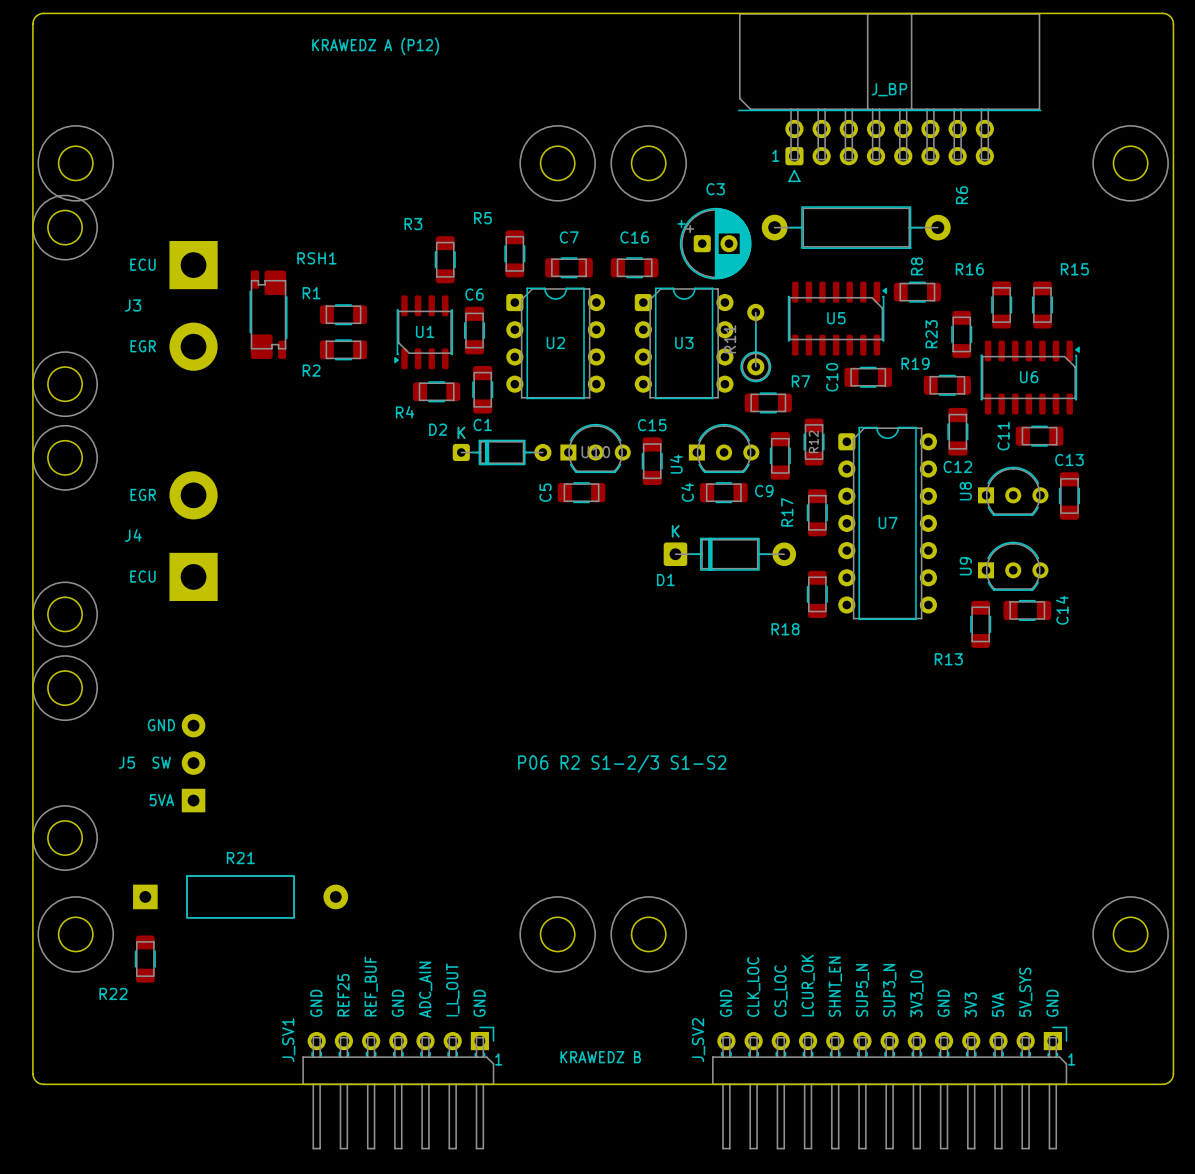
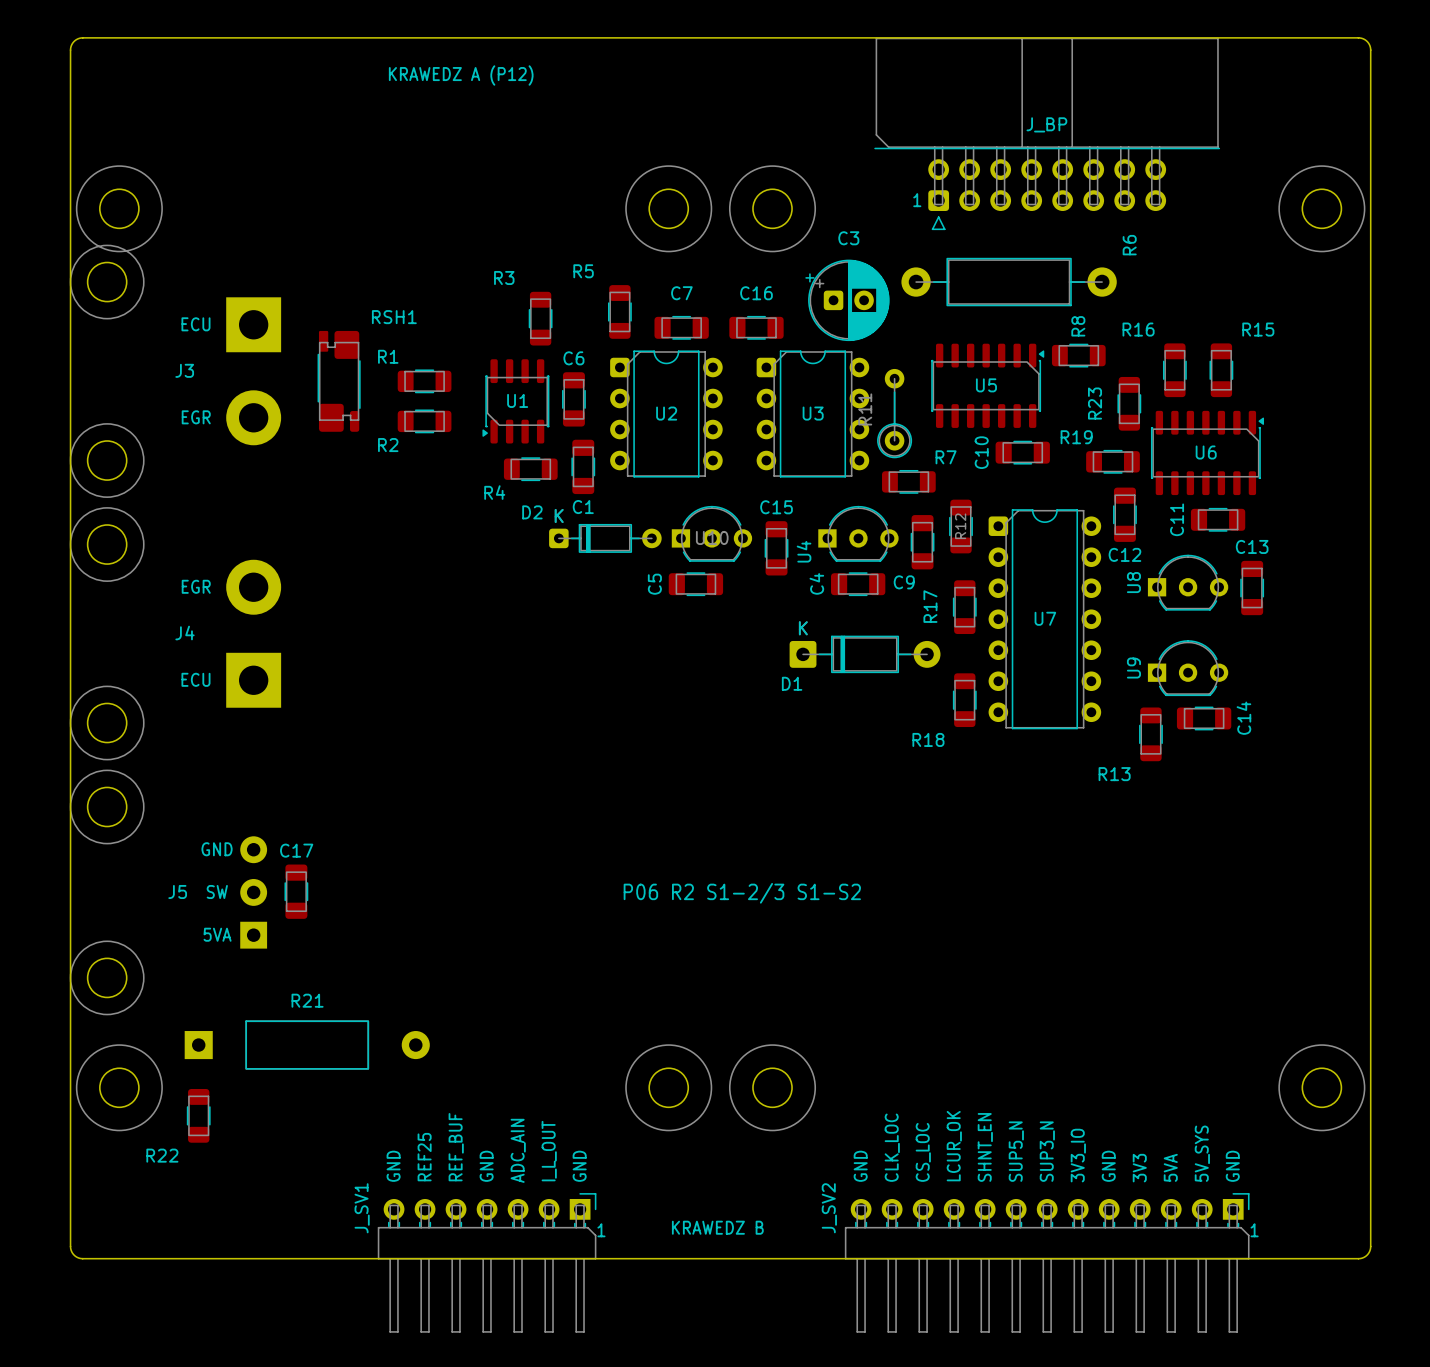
C17: none -> (296, 891)

